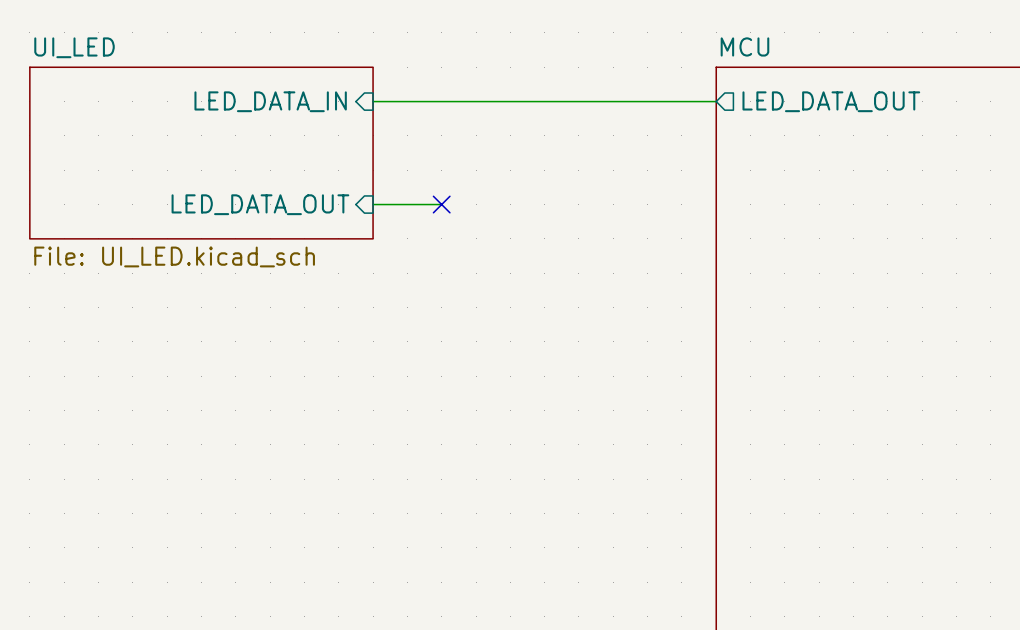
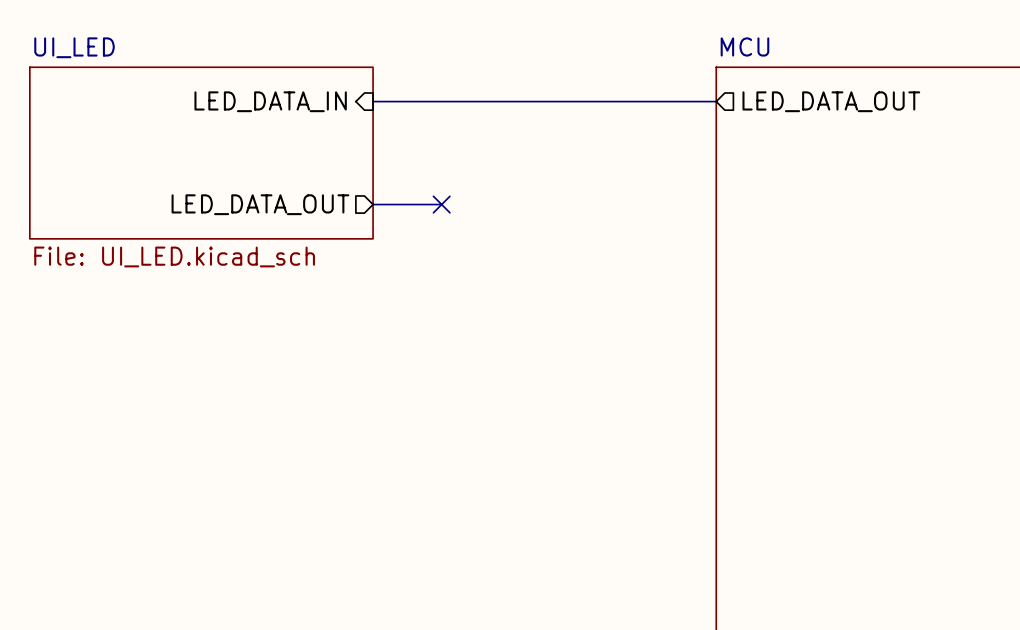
sheet pin shape: input (260, 204) -> output (260, 204)

